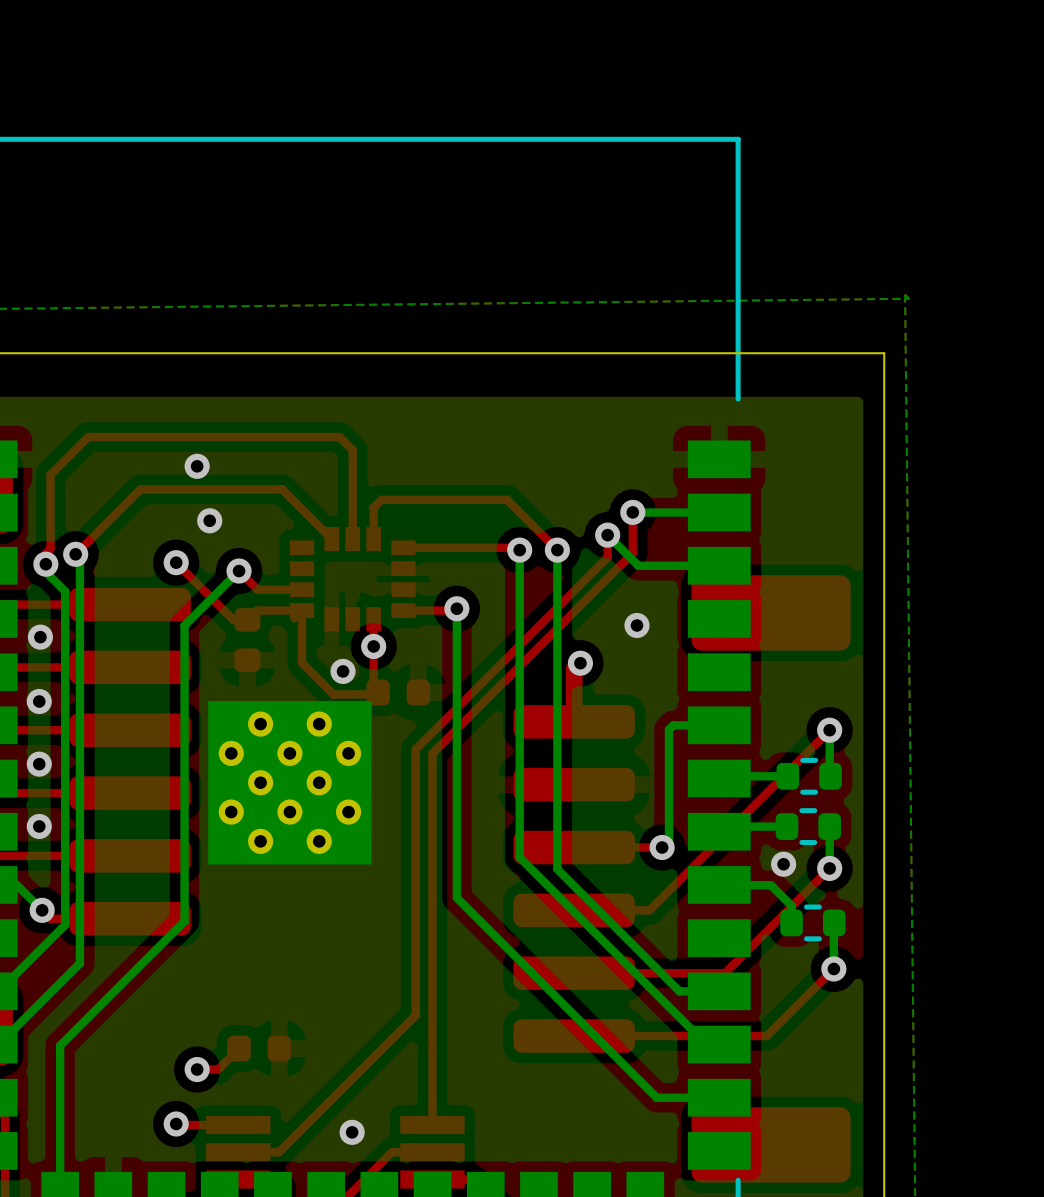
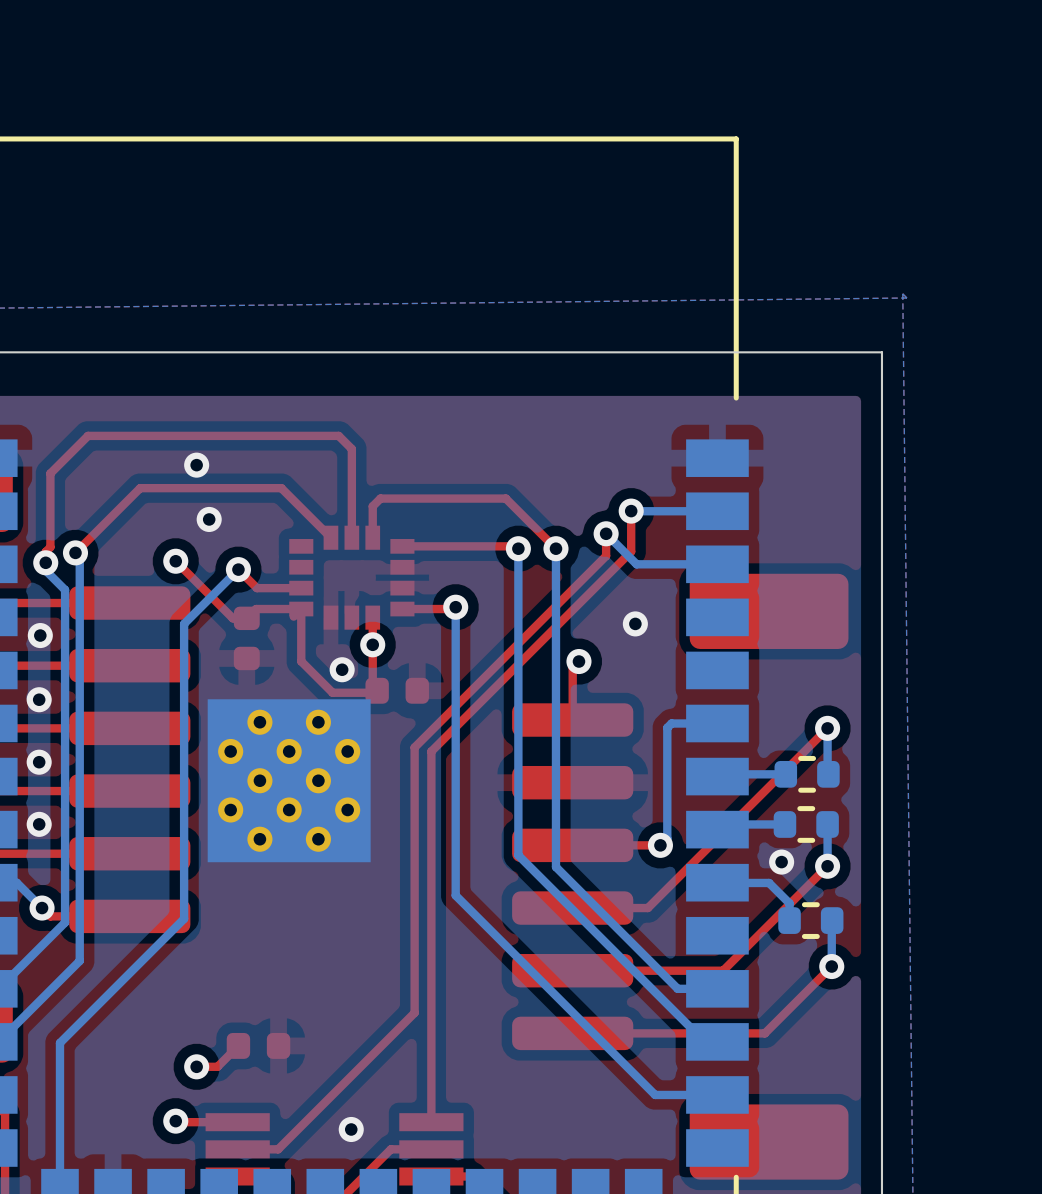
top track width: thick (580, 663) (574, 669) (574, 721) -> thin (578, 661) (572, 667) (572, 720)

